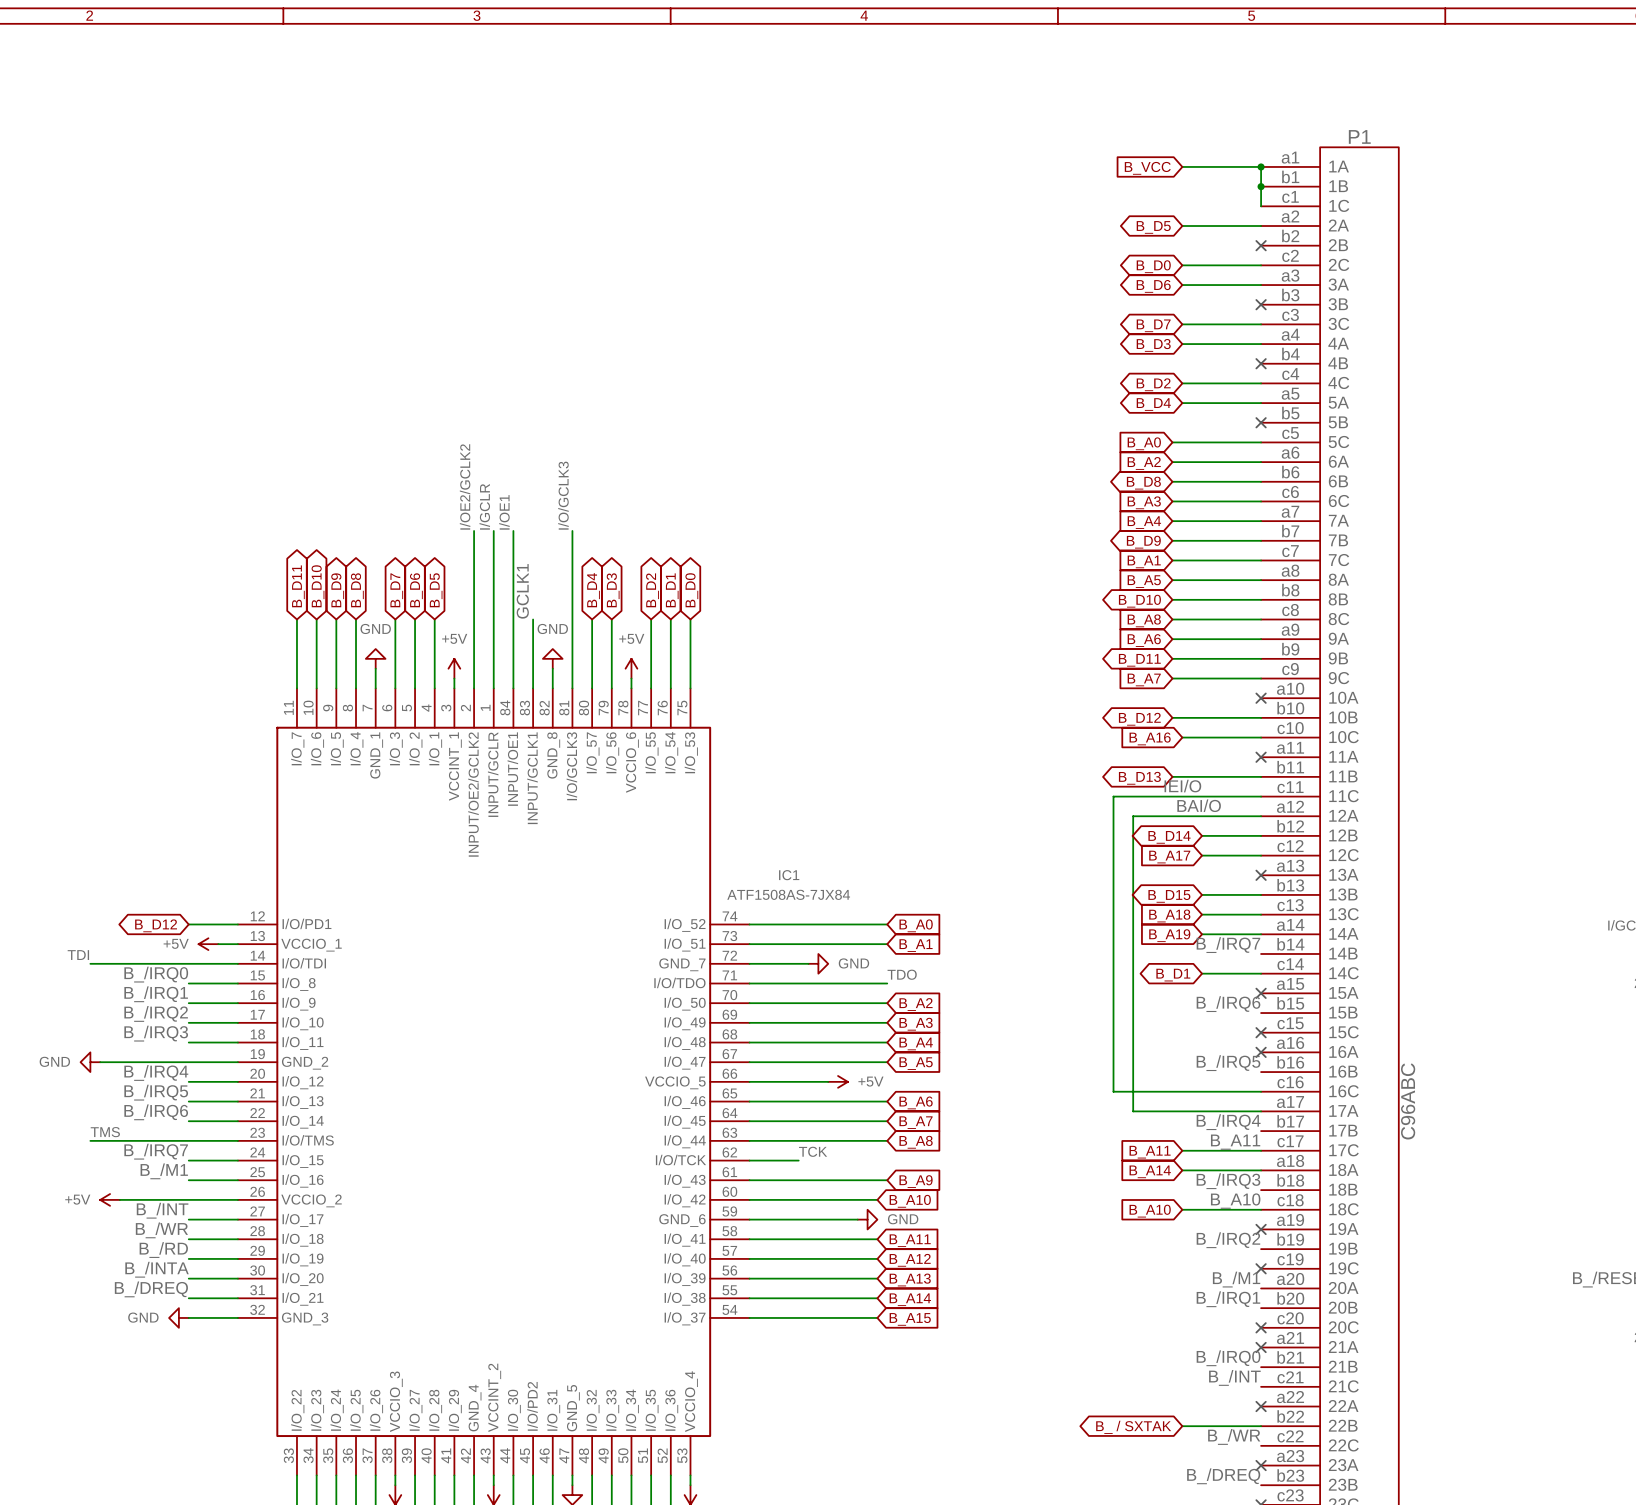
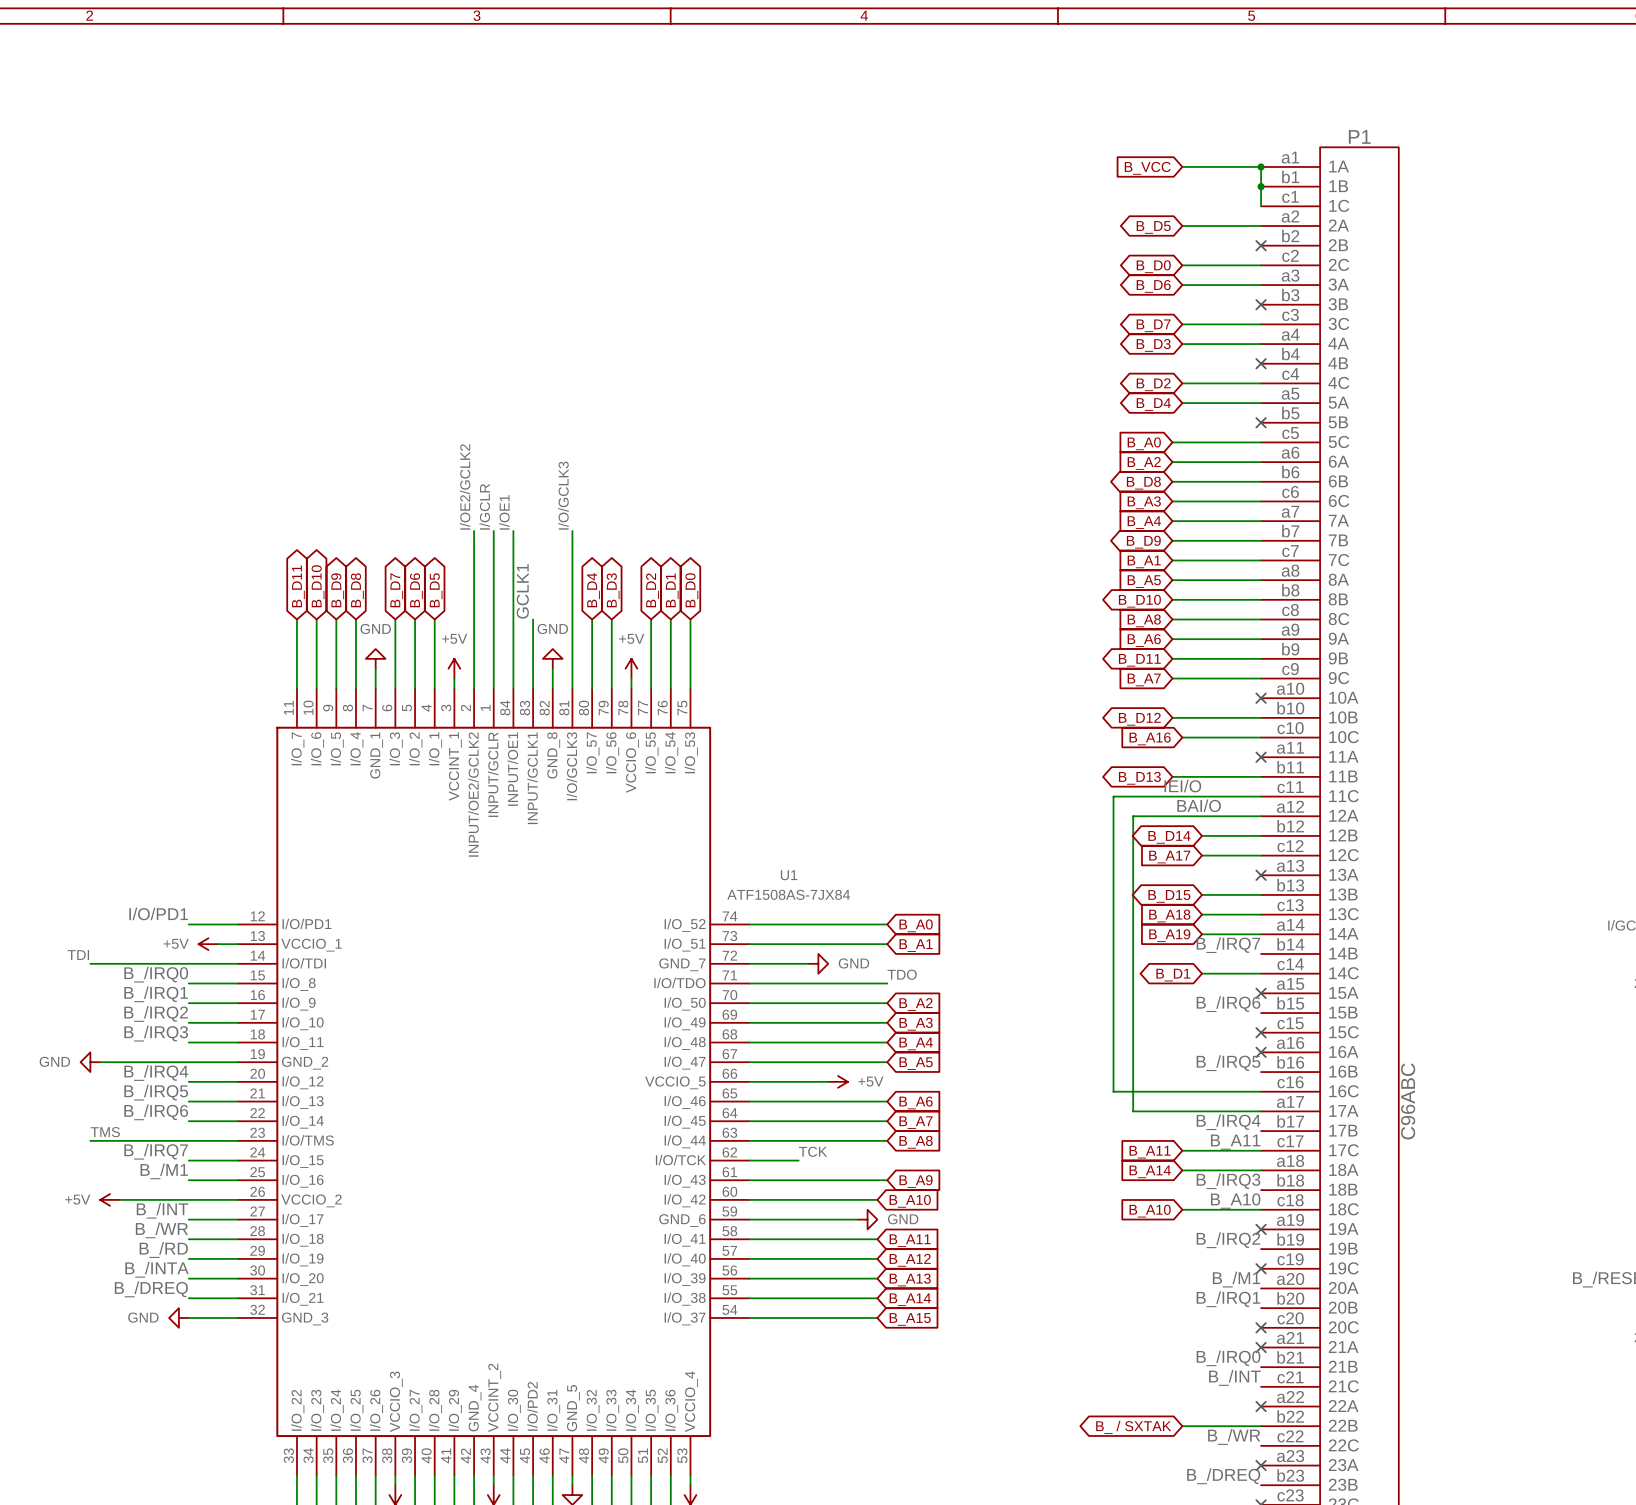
IC1 name: IC1 (789, 875) -> U1 (789, 875)
label: none -> I/O/PD1 (158, 913)
global label: B_D12 (156, 925) -> none

